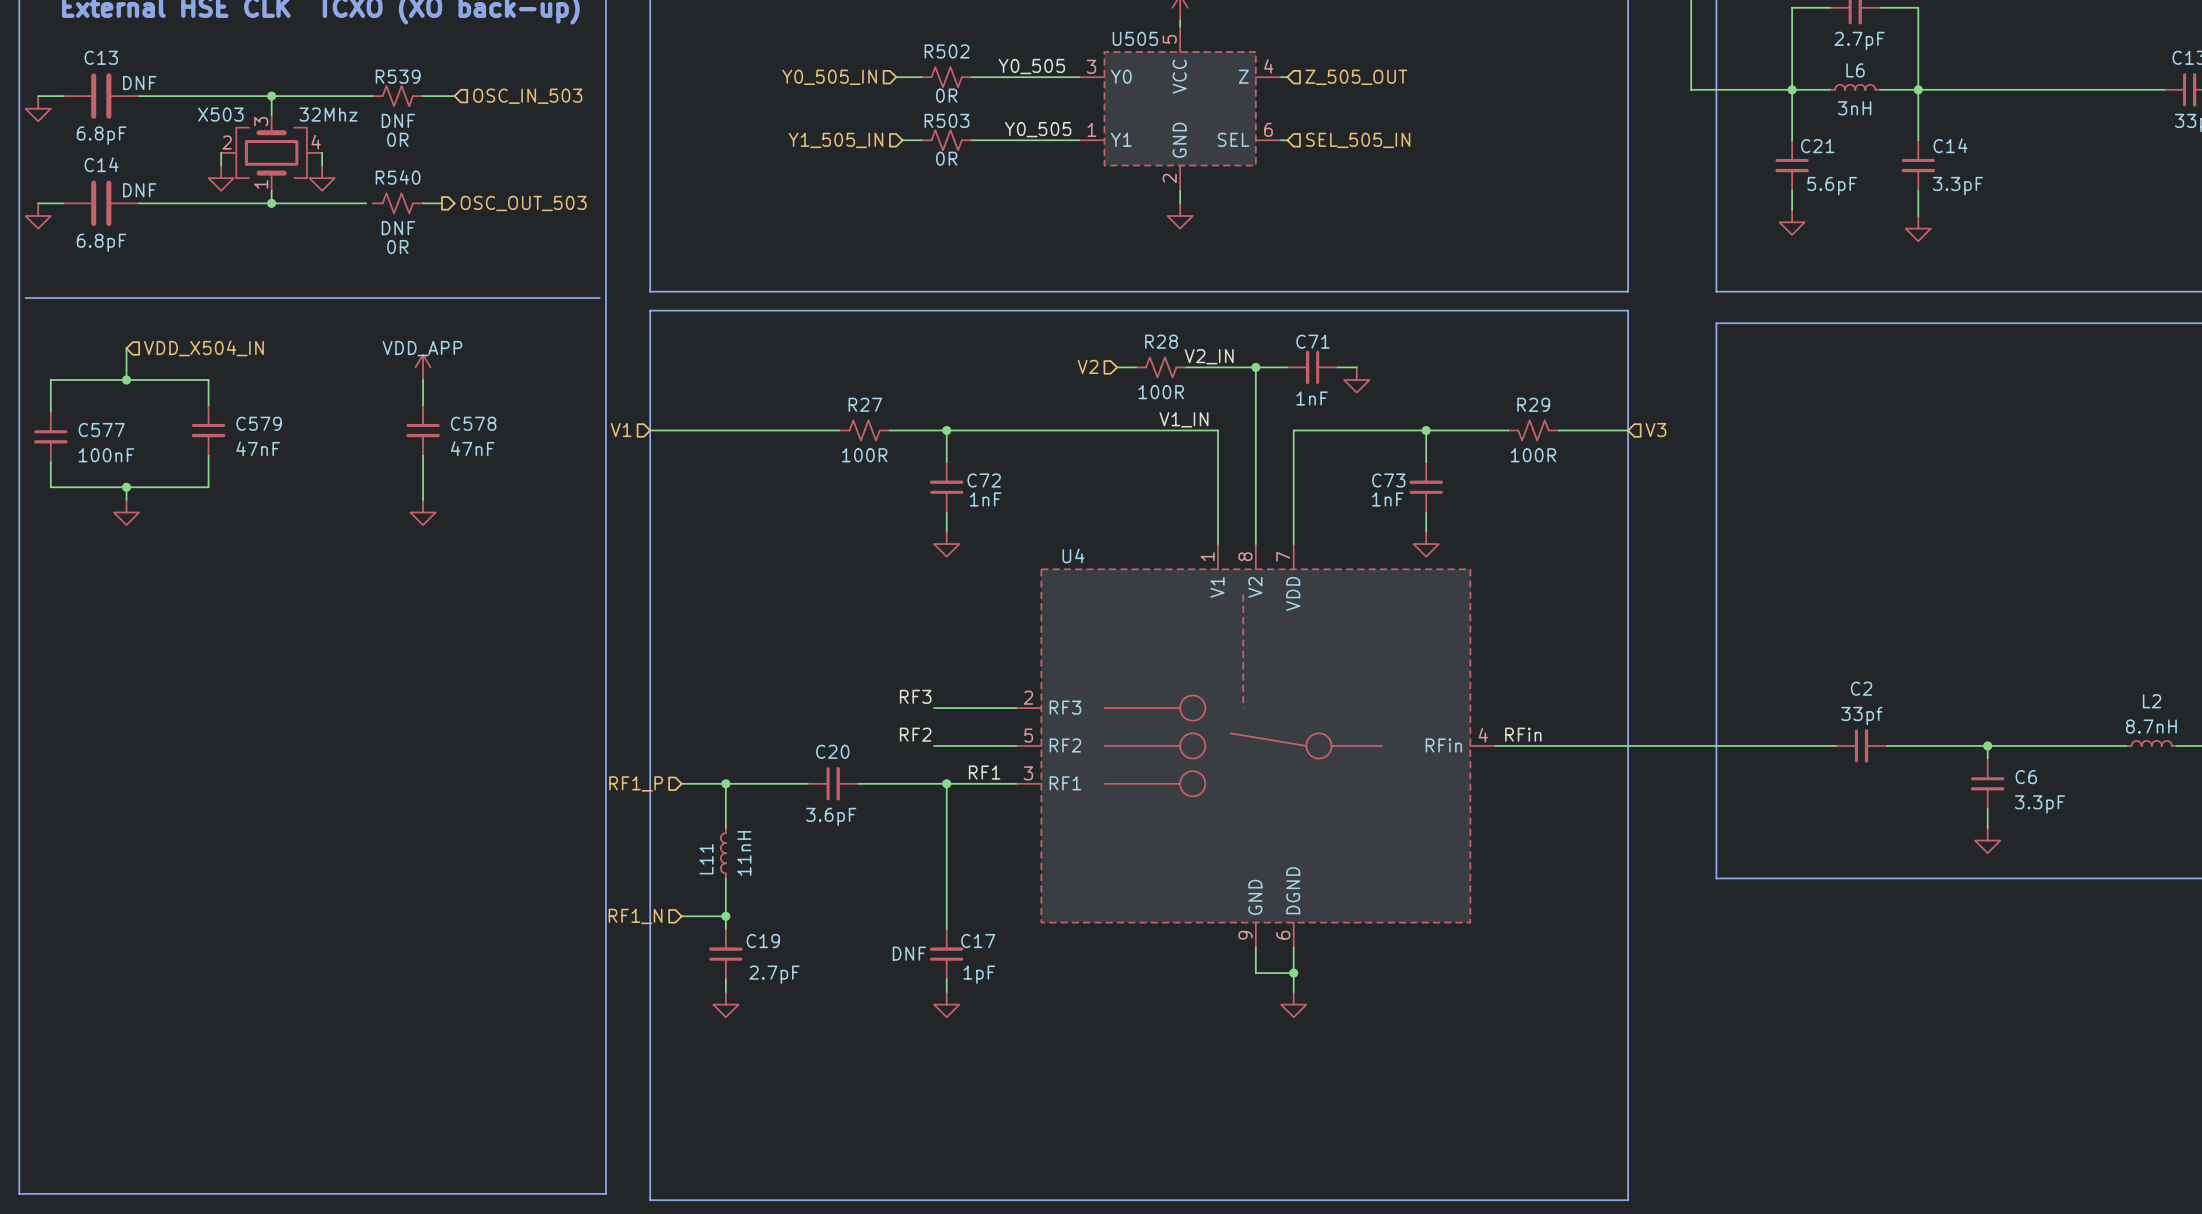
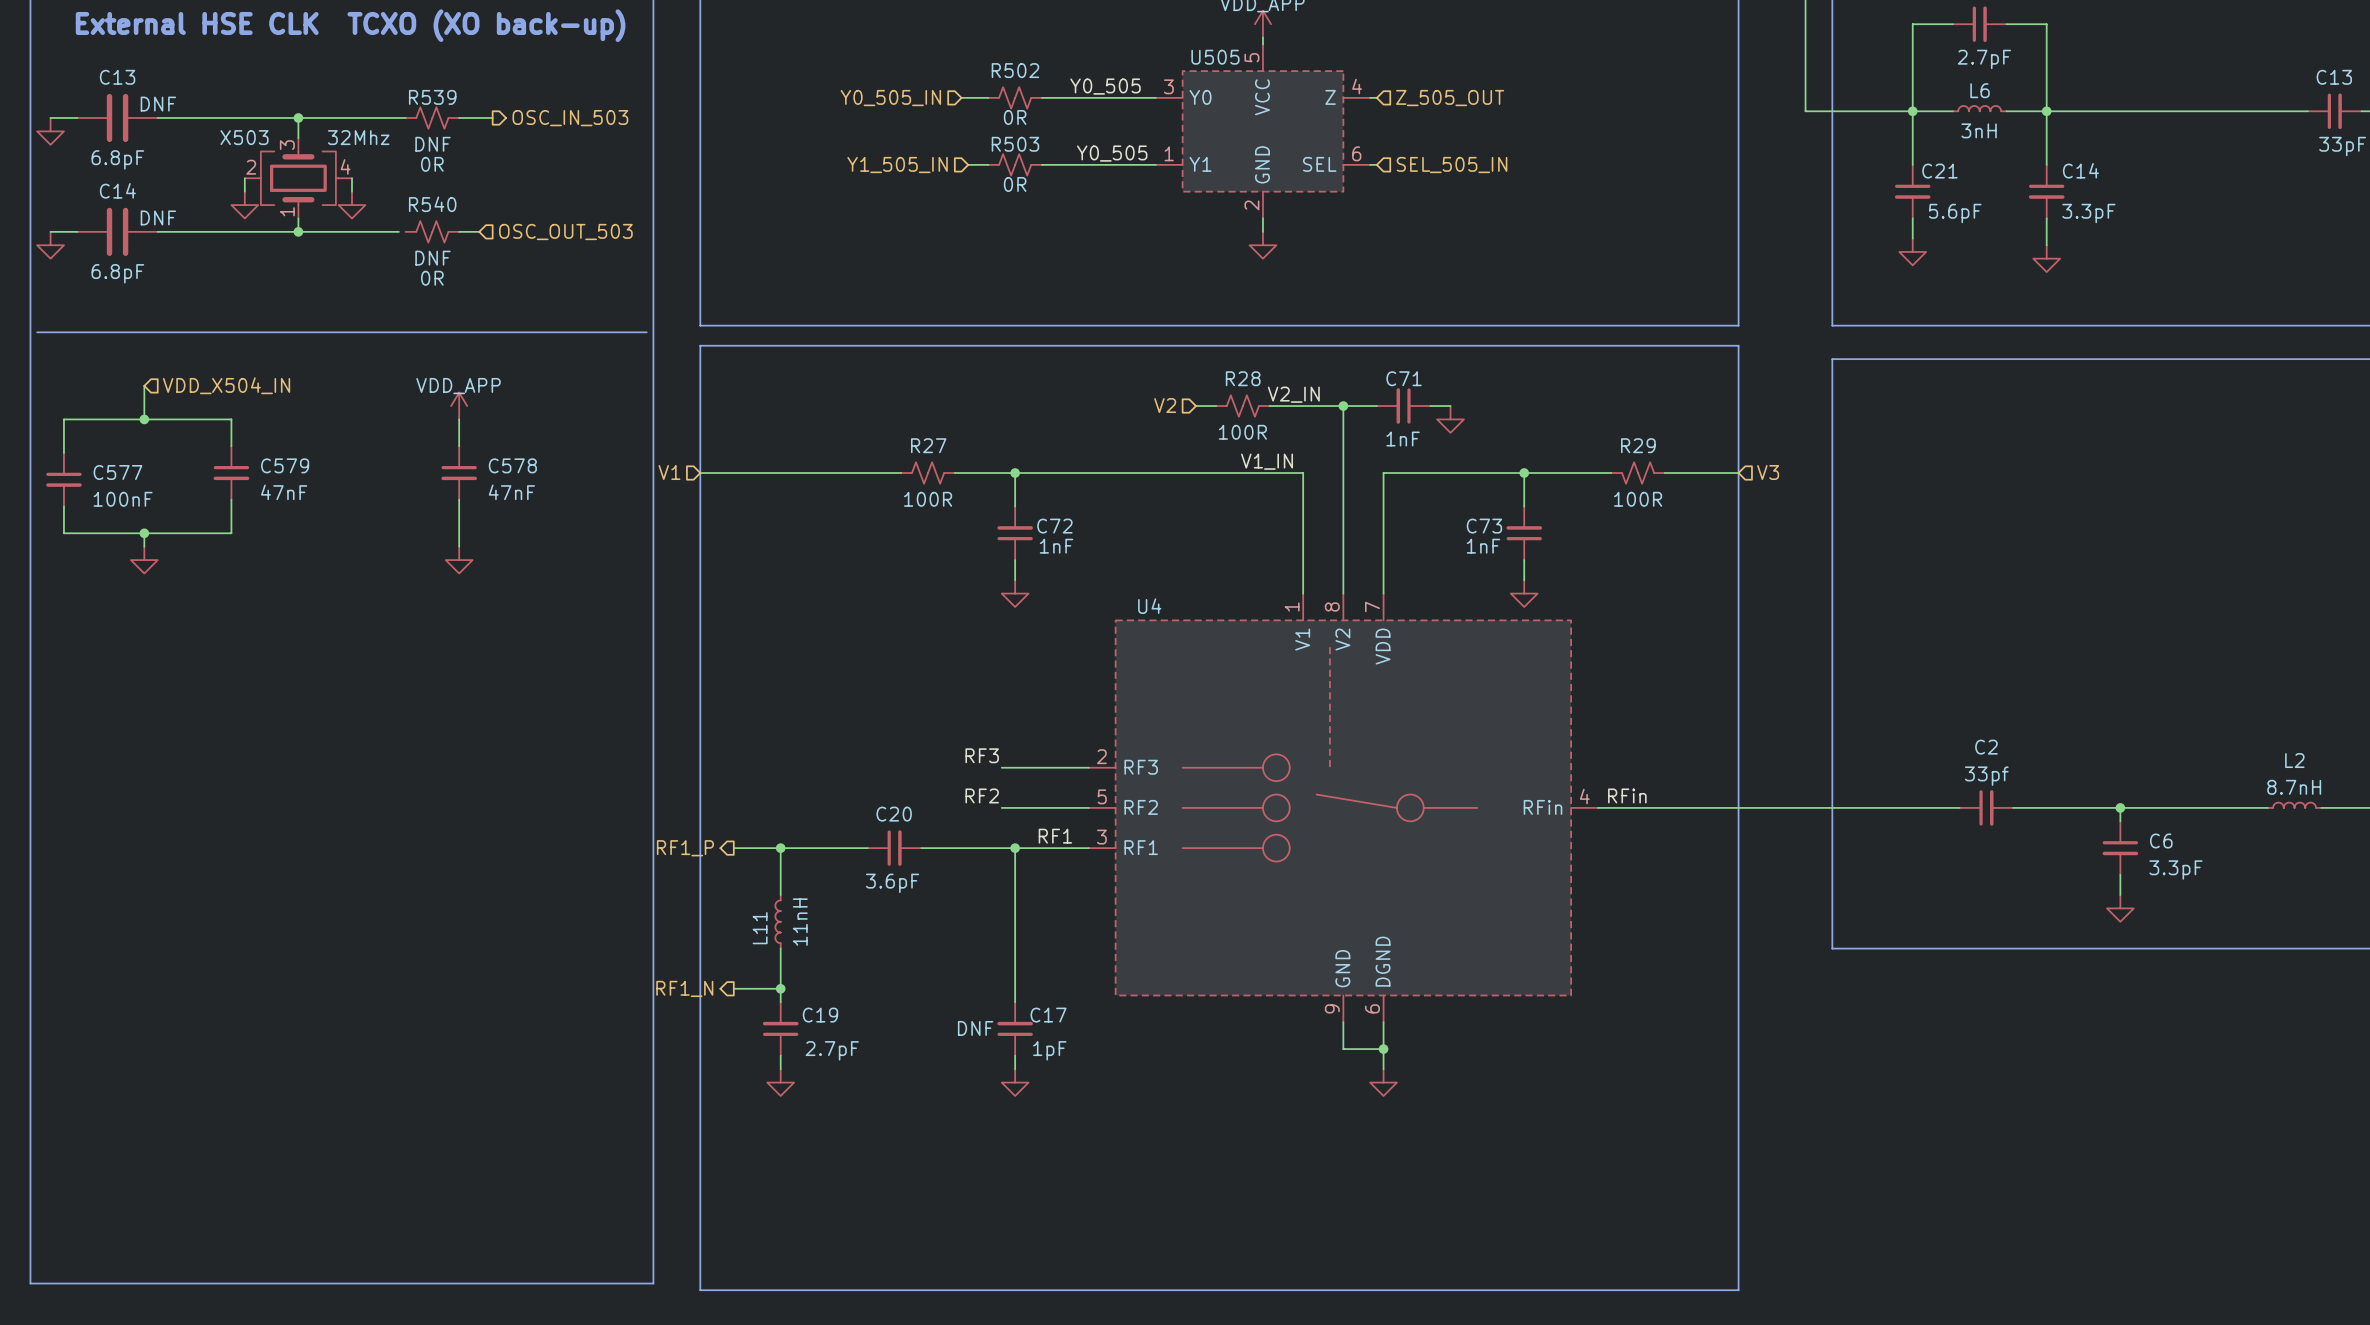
hierarchical label shape: input (527, 96) -> output (570, 118)
hierarchical label shape: output (523, 203) -> input (565, 232)
hierarchical label shape: input (636, 783) -> output (685, 848)
hierarchical label shape: input (635, 916) -> output (684, 988)

